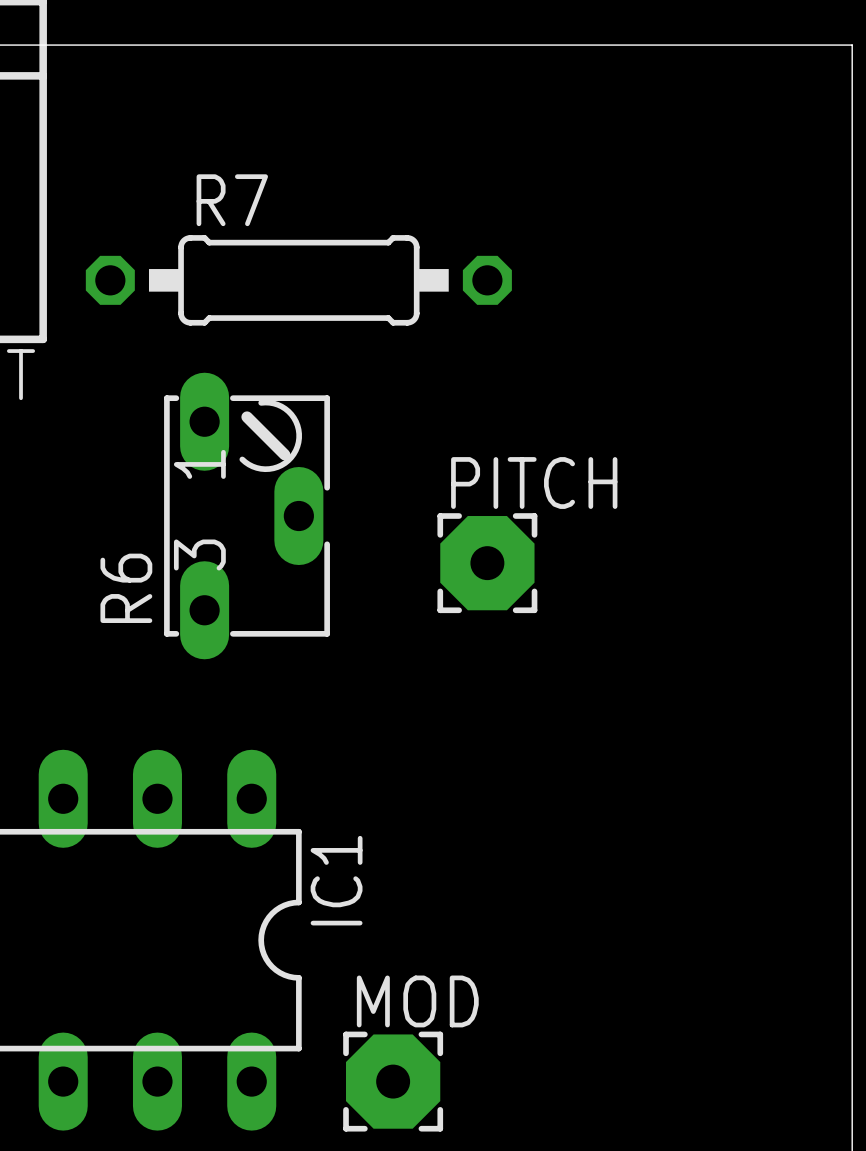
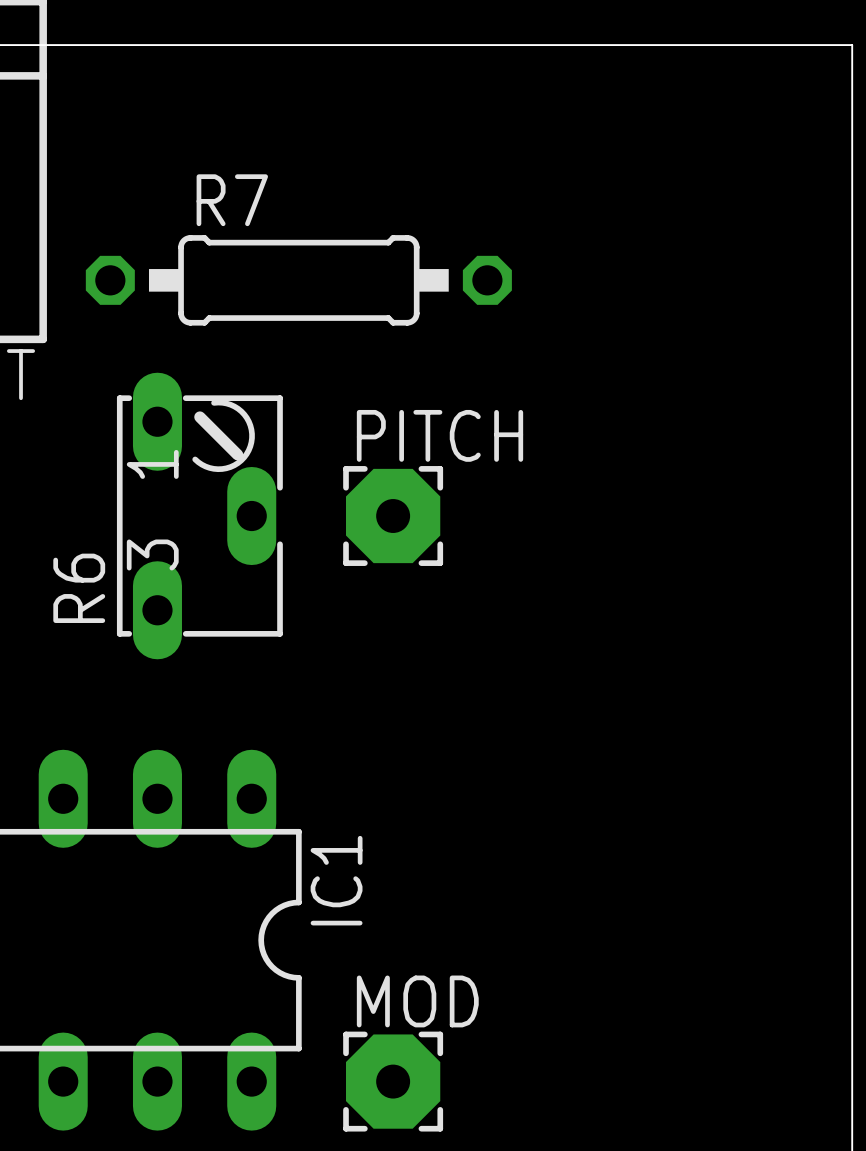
R6 position: (247, 516) -> (199, 516)
PITCH position: (487, 563) -> (393, 516)

